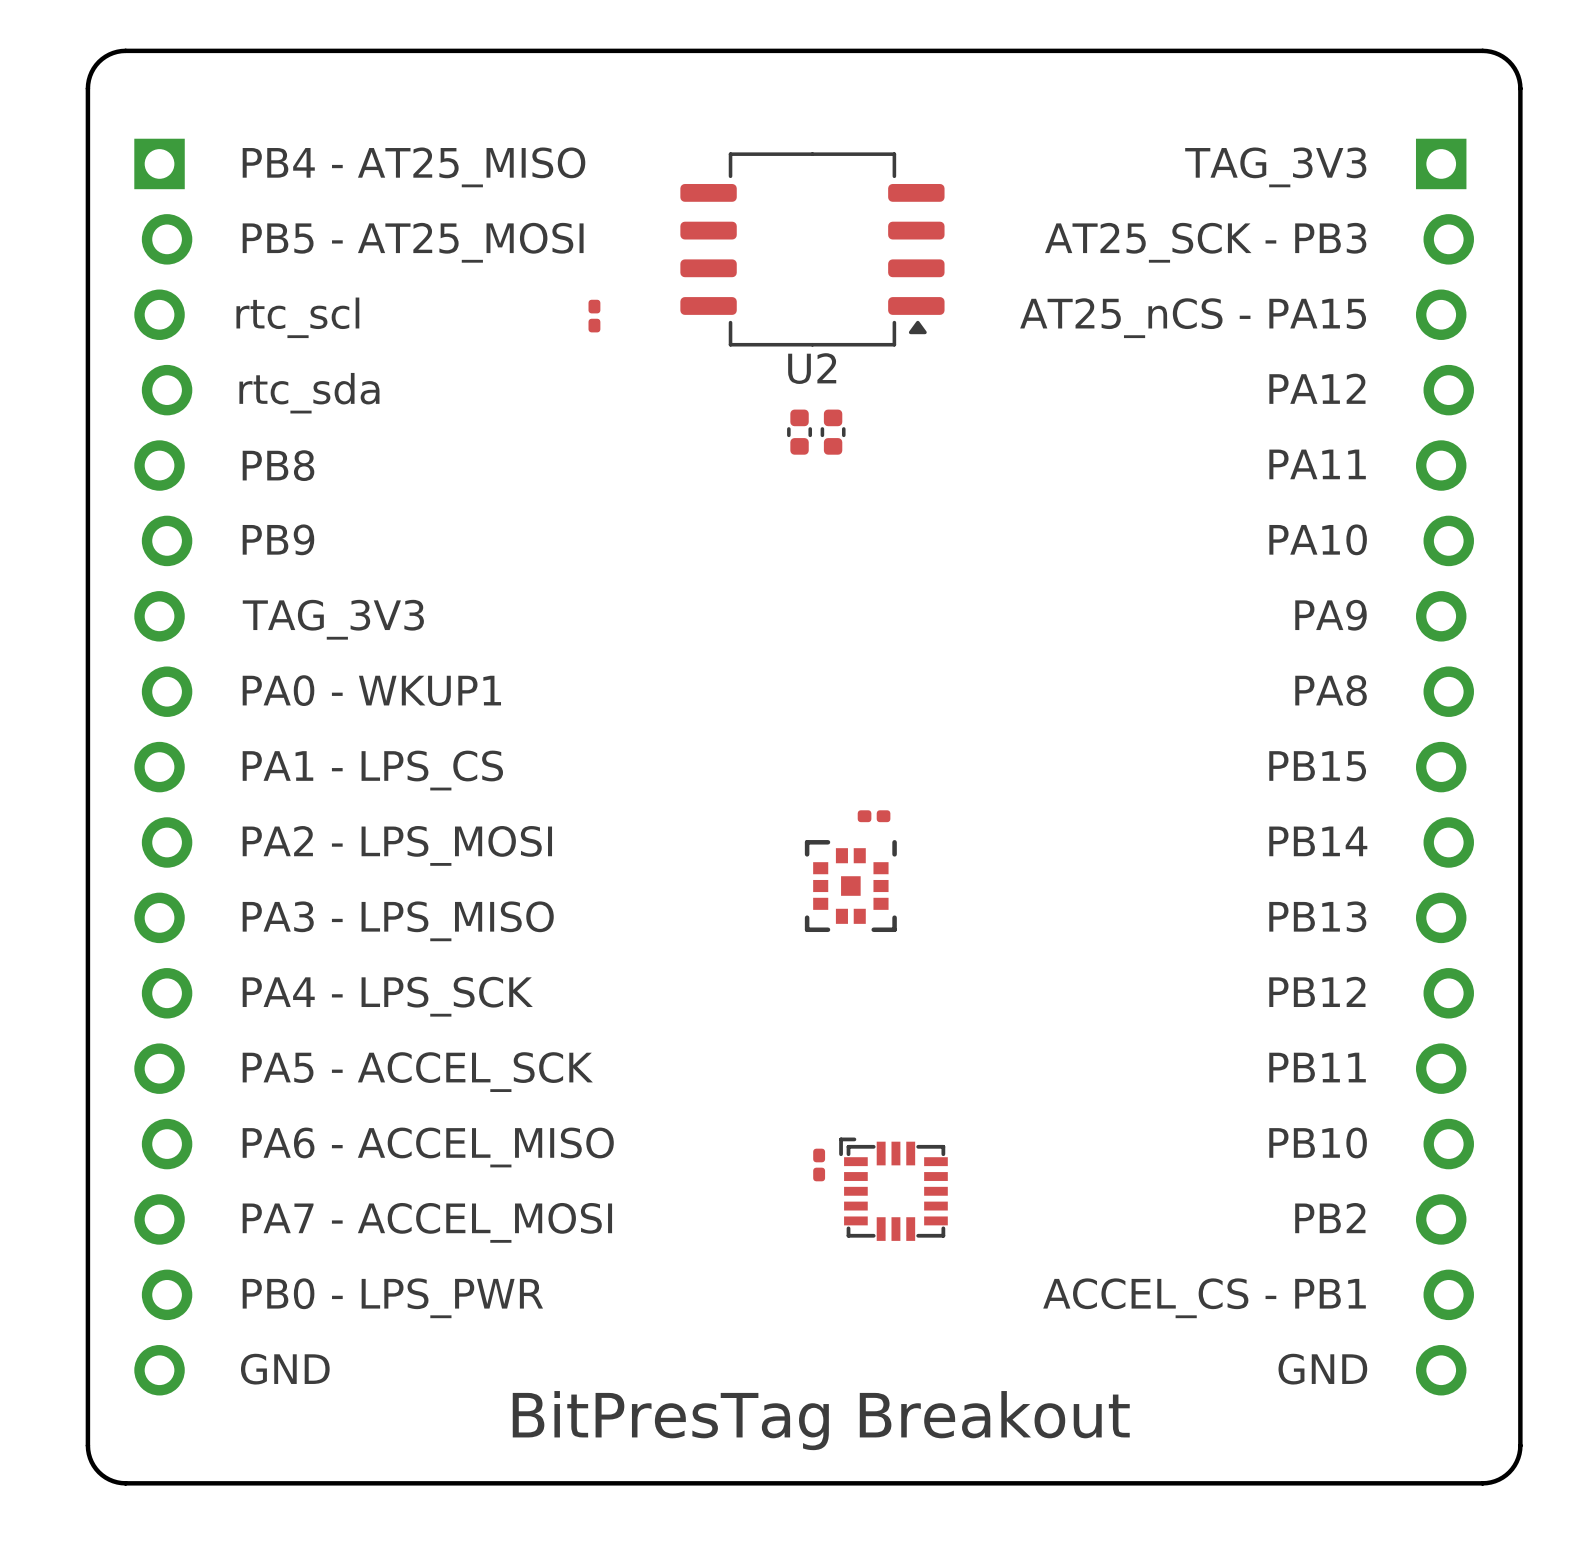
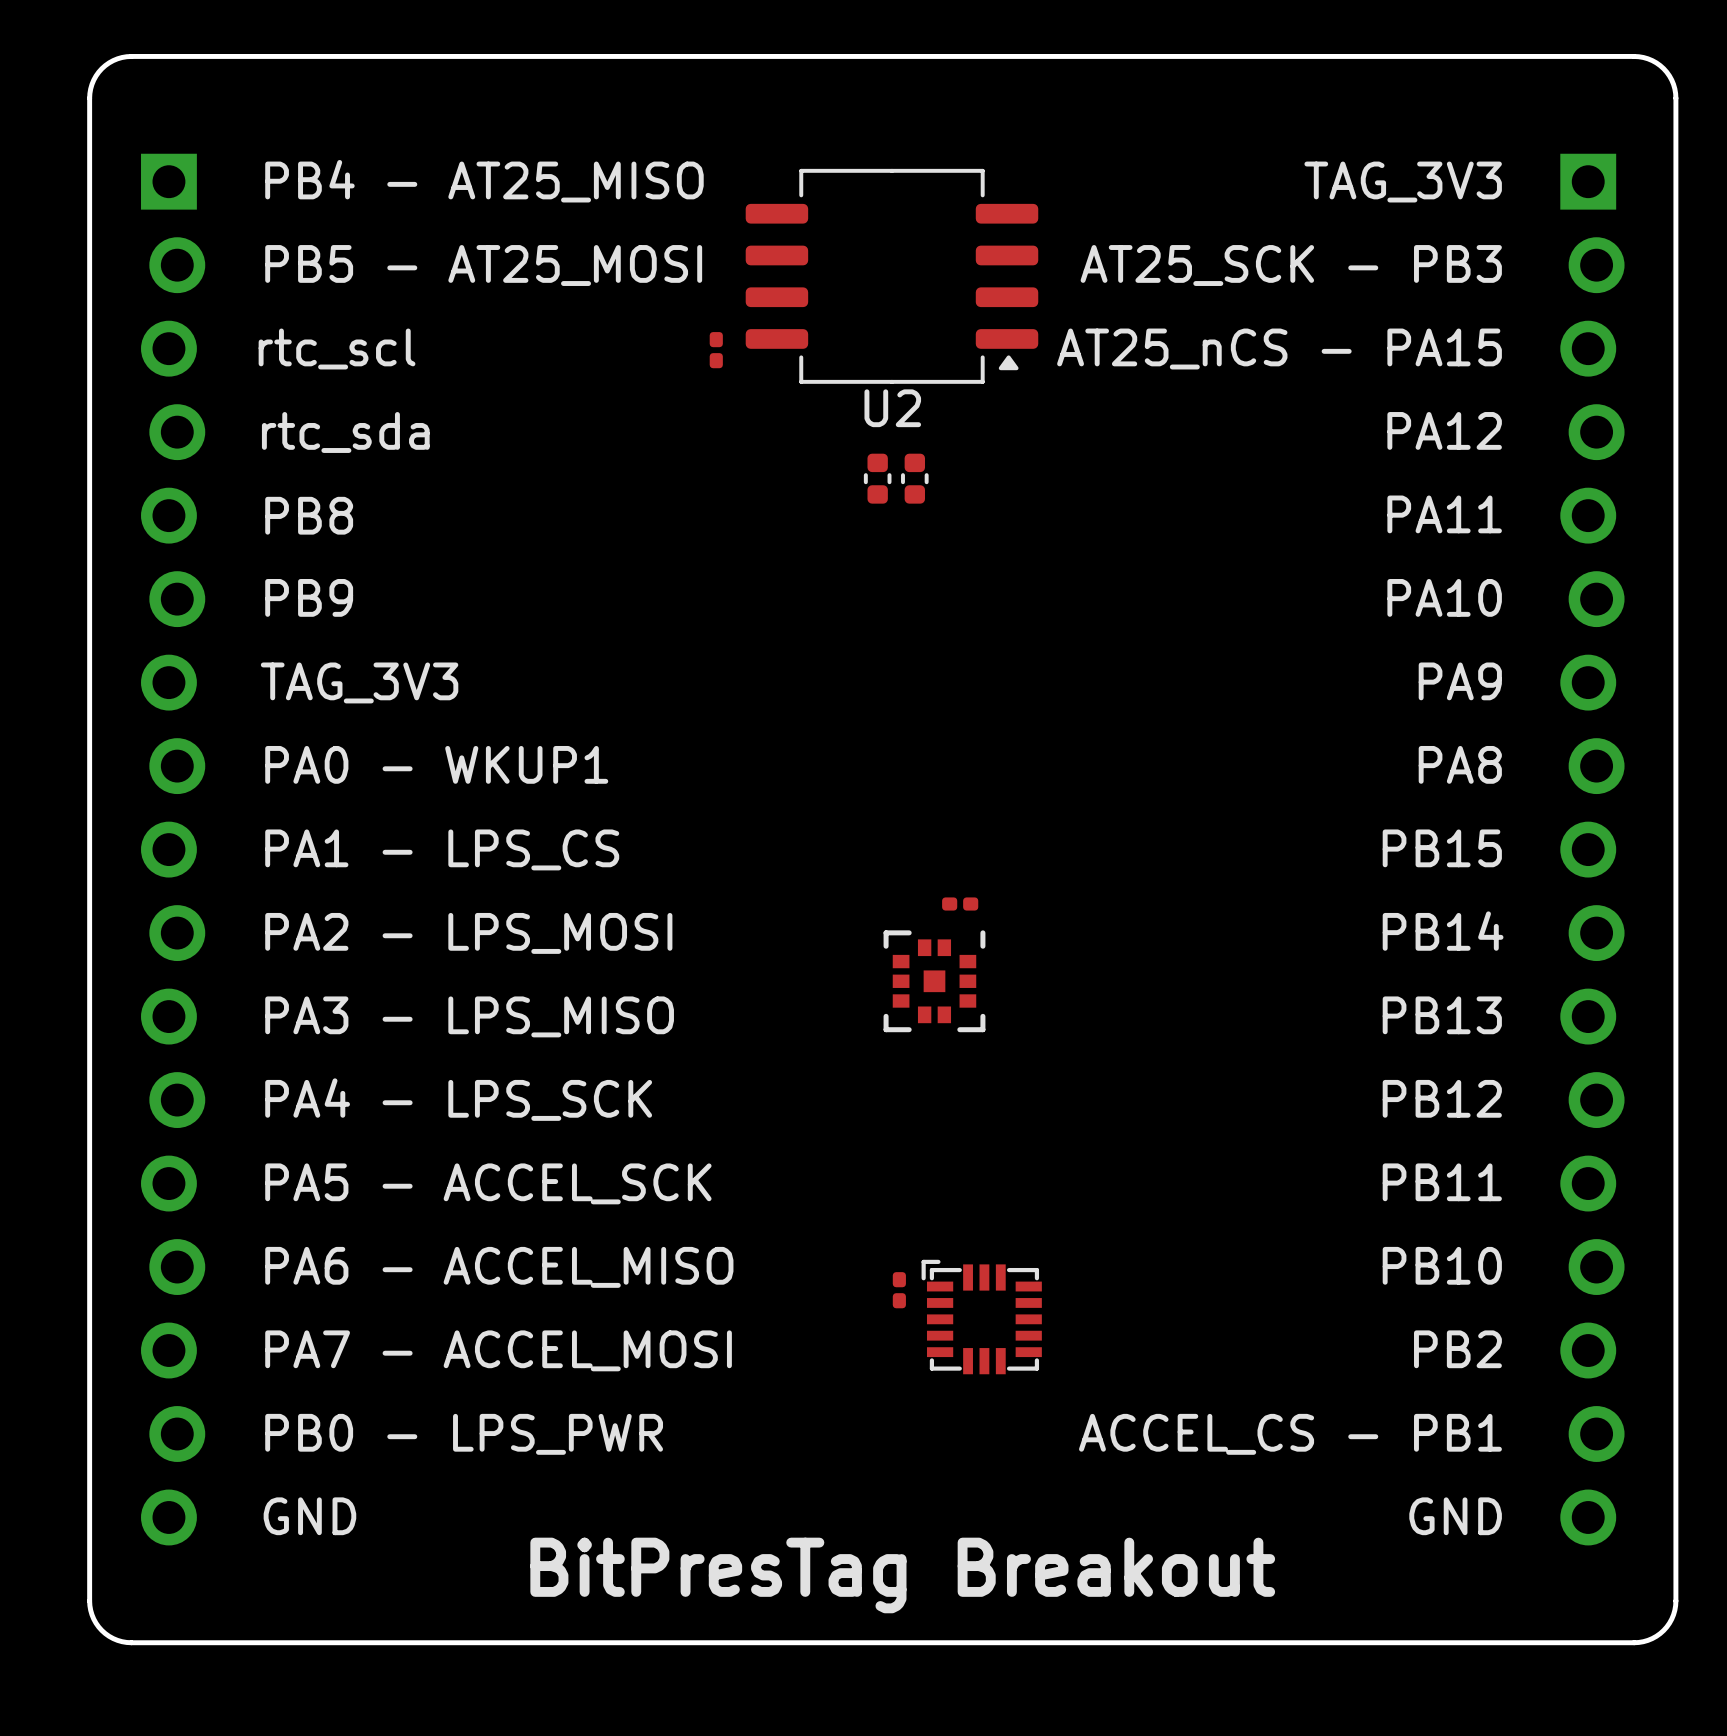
part position: (594, 316) -> (716, 350)

